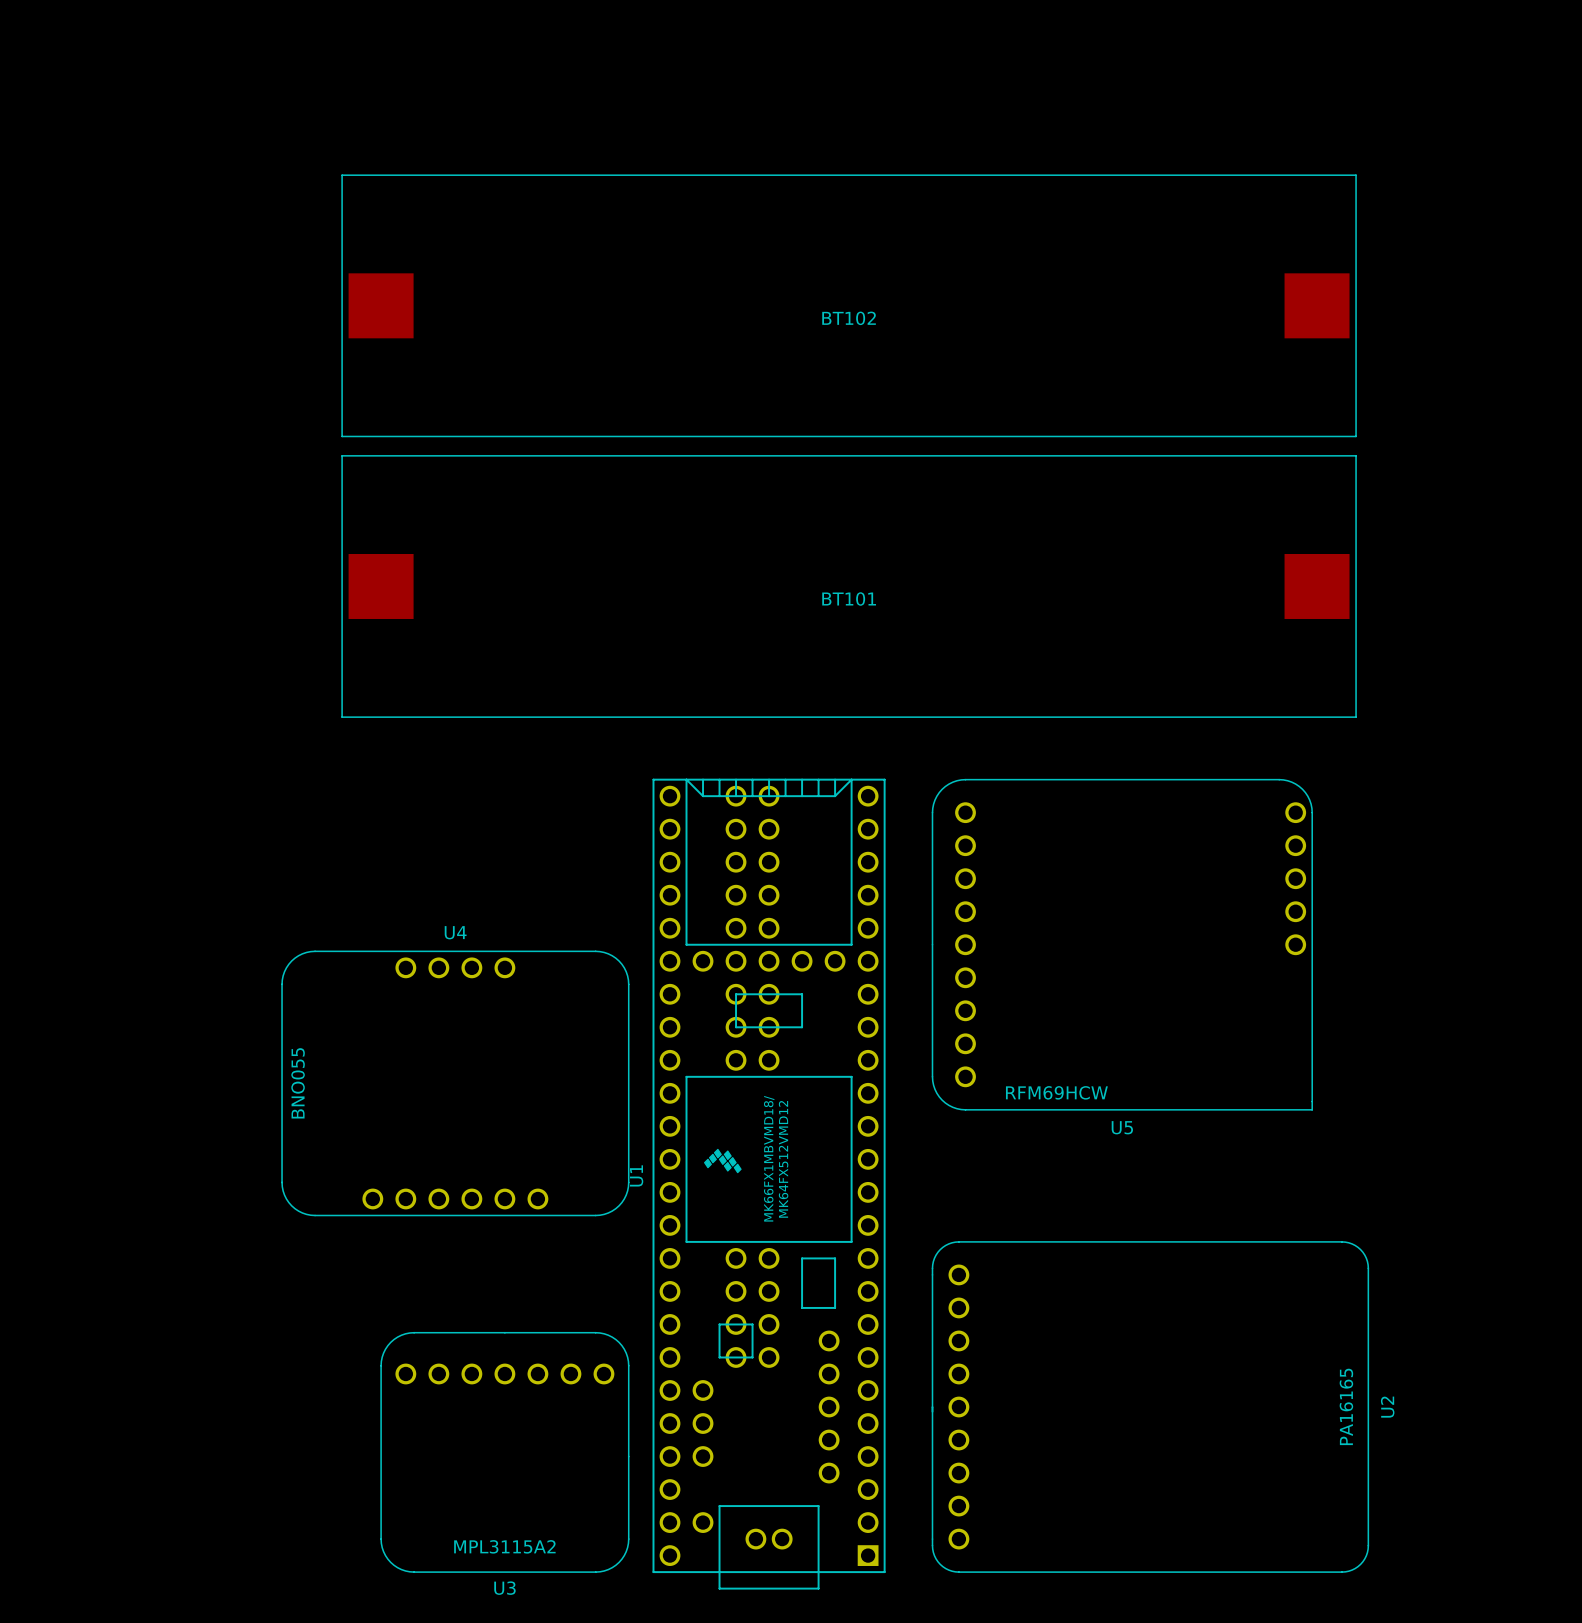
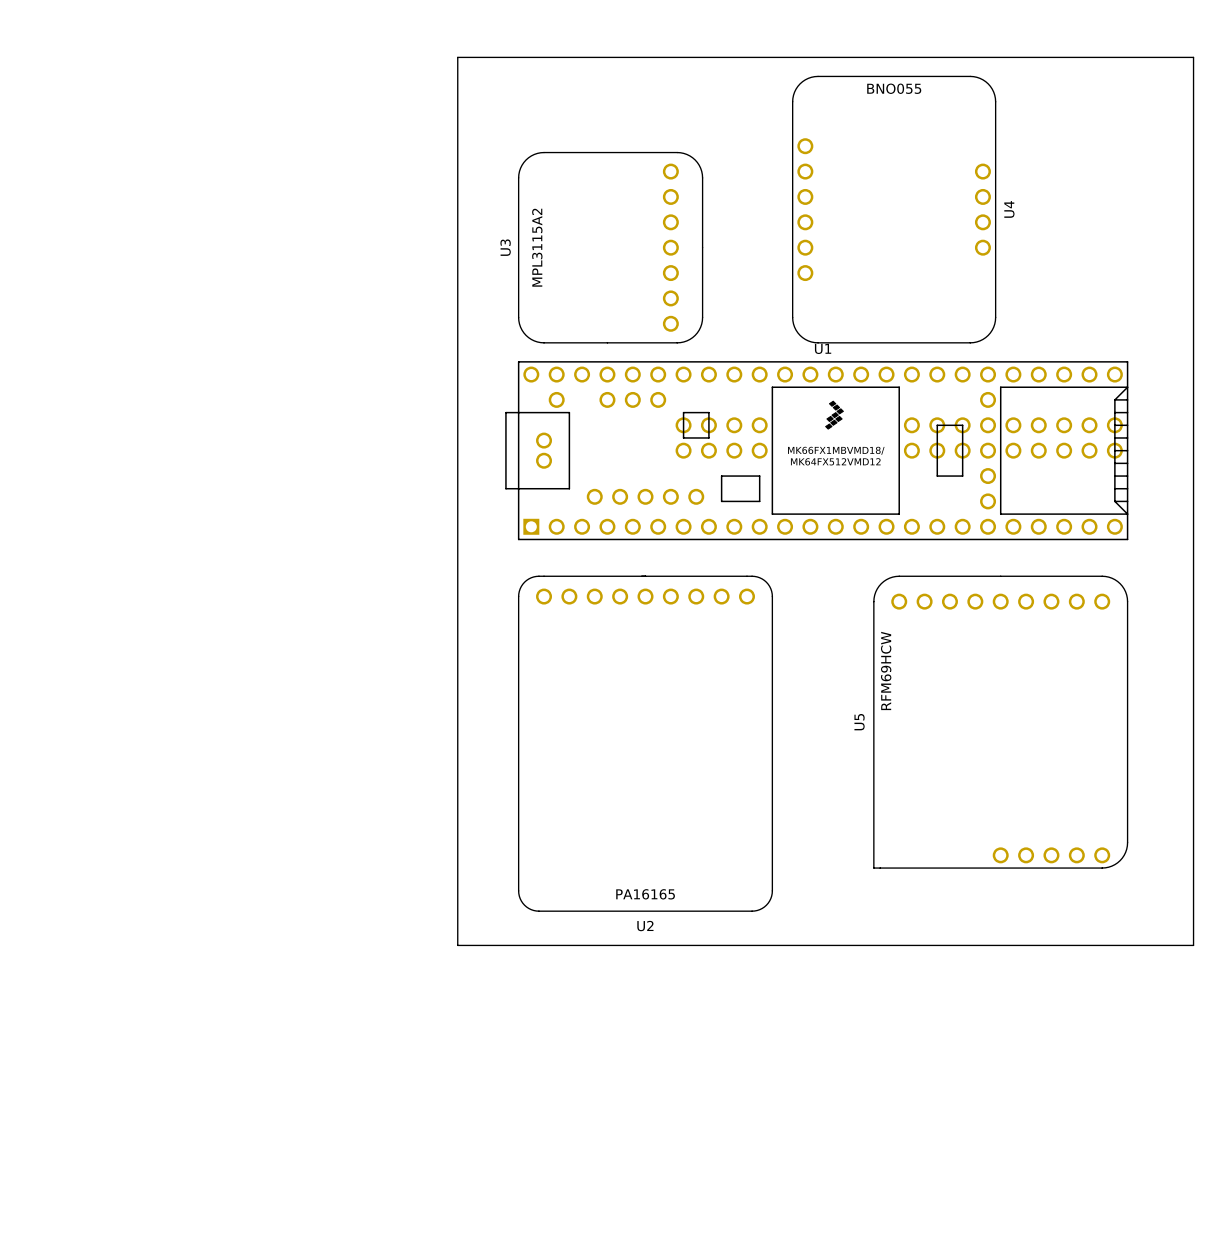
board edge: none -> (457, 57) (457, 945) (1193, 945) (1193, 57) (457, 57)
BT102: (849, 305) -> none
BT101: (849, 586) -> none
U5 rotation: 0° (1122, 944) -> 90° clockwise (1000, 722)
U4 rotation: 0° (455, 1083) -> 90° clockwise (894, 209)
U4 position: (455, 1083) -> (894, 209)
U1 rotation: 0° (769, 1184) -> 90° clockwise (816, 450)
U1 position: (769, 1184) -> (816, 450)
U2 rotation: 0° (1150, 1407) -> 90° clockwise (645, 743)
U2 position: (1150, 1407) -> (645, 743)
U3 rotation: 0° (504, 1452) -> 90° clockwise (610, 247)
U3 position: (504, 1452) -> (610, 247)

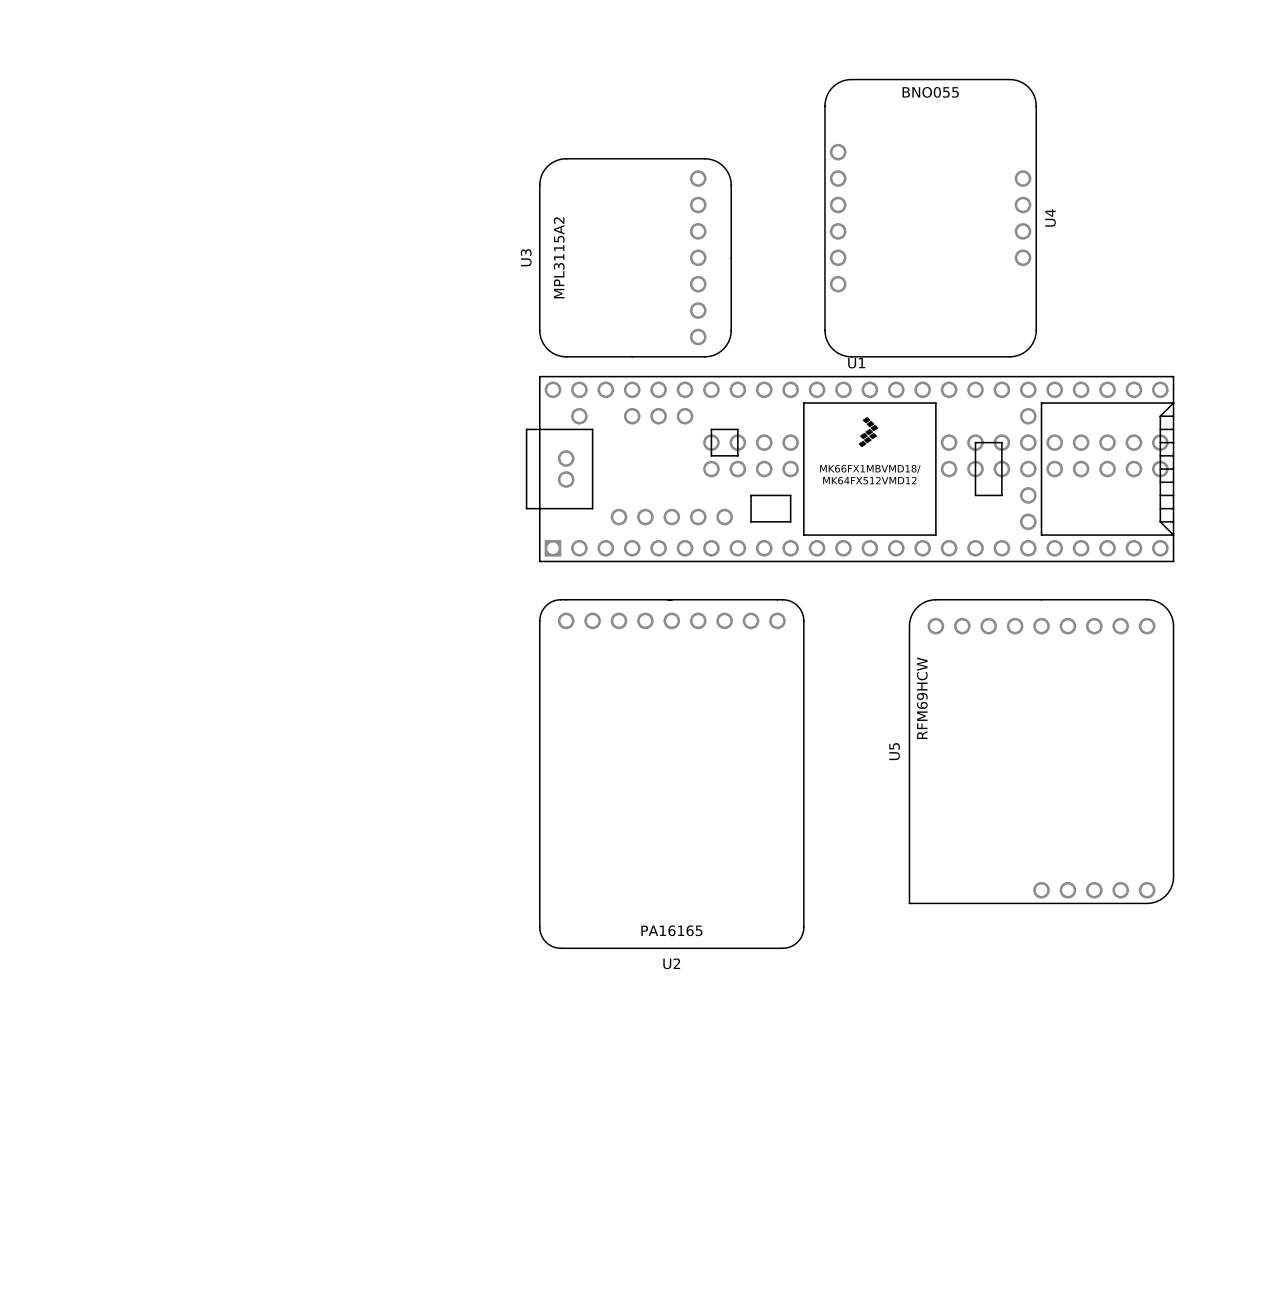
board edge: (457, 57) (457, 945) (1193, 945) (1193, 57) (457, 57) -> none

